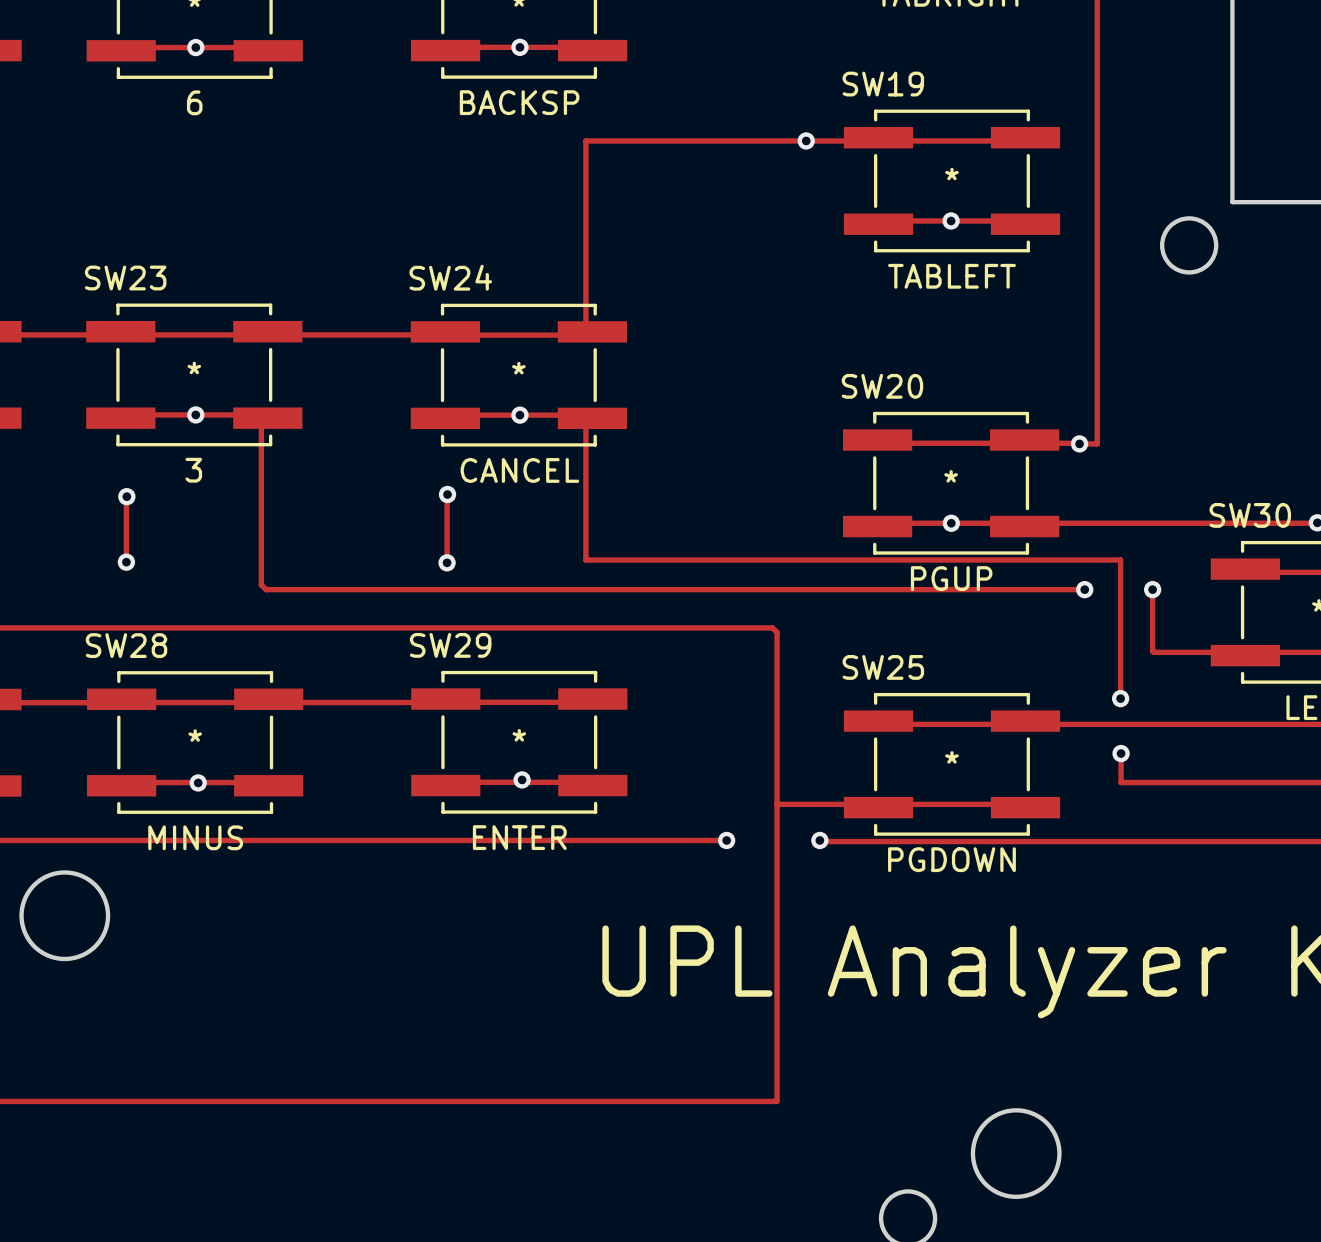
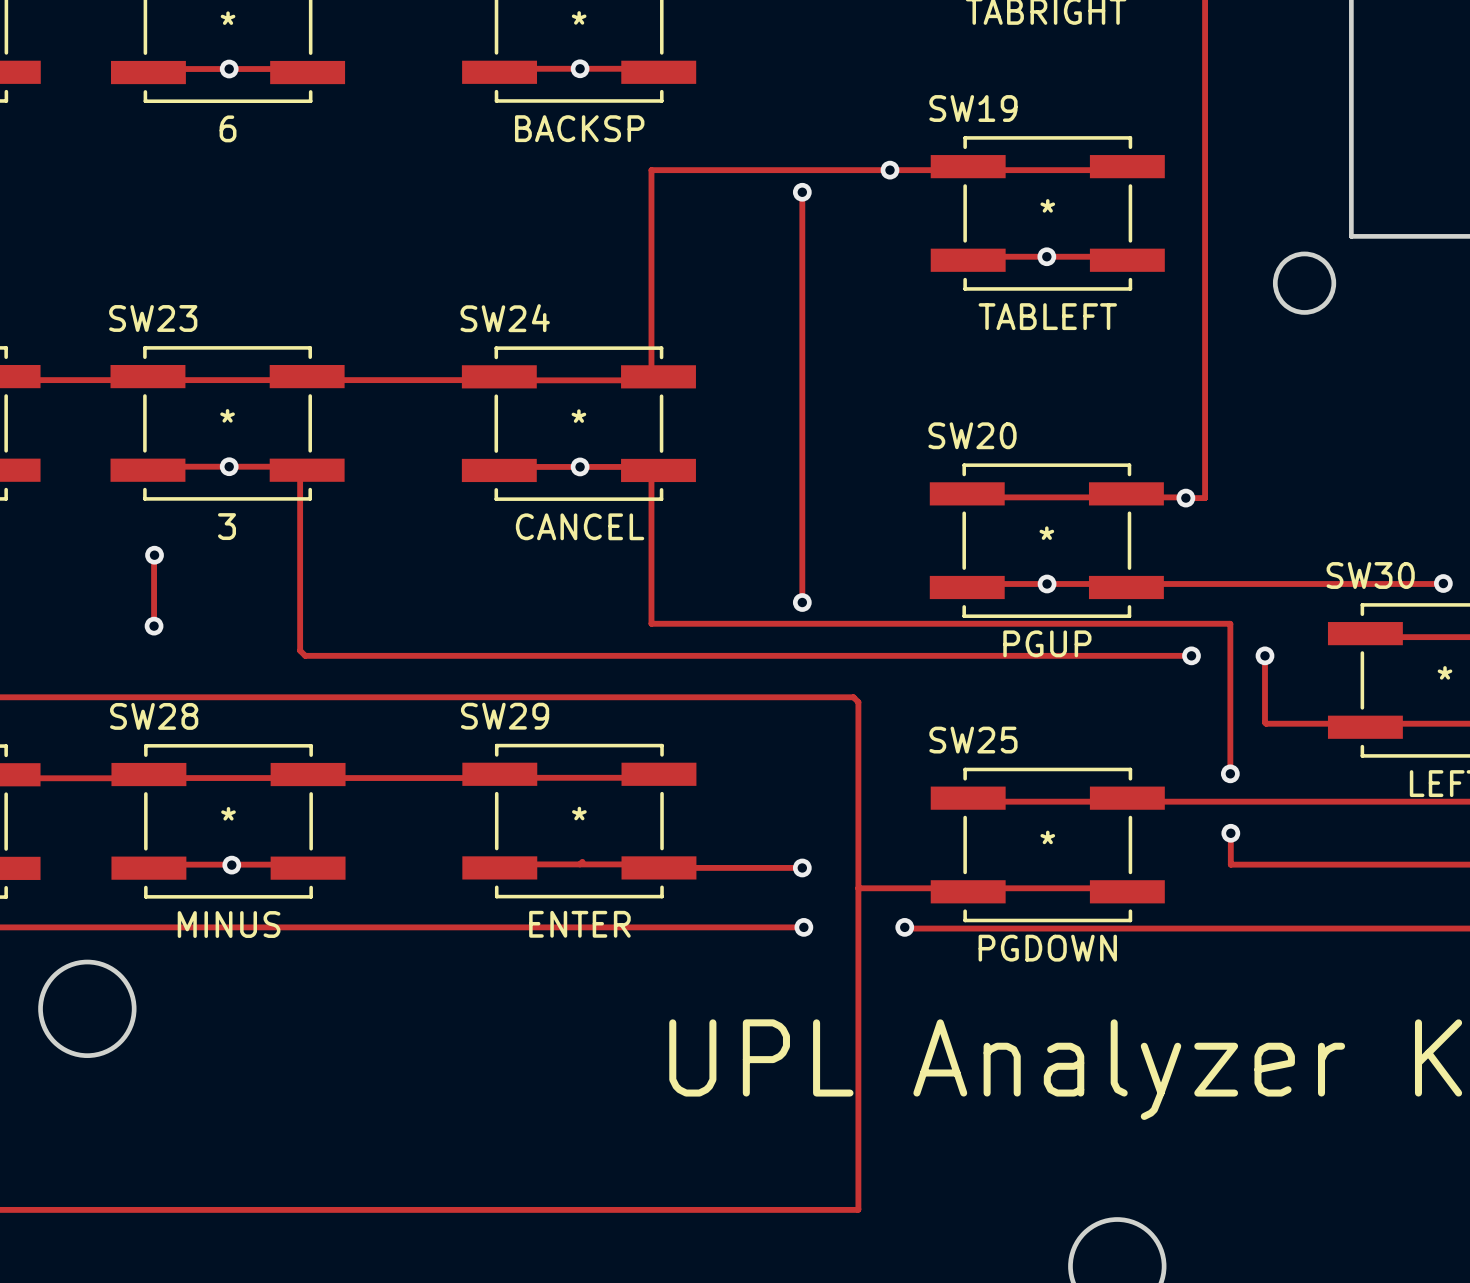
track: none -> (802, 192) (802, 602)
via: none -> (802, 192)
track: (447, 494) (447, 562) -> none
via: (447, 494) -> none
via: none -> (802, 602)
via: (447, 562) -> none
via: (522, 779) -> none
track: none -> (658, 867) (802, 867)
via: none -> (802, 867)

